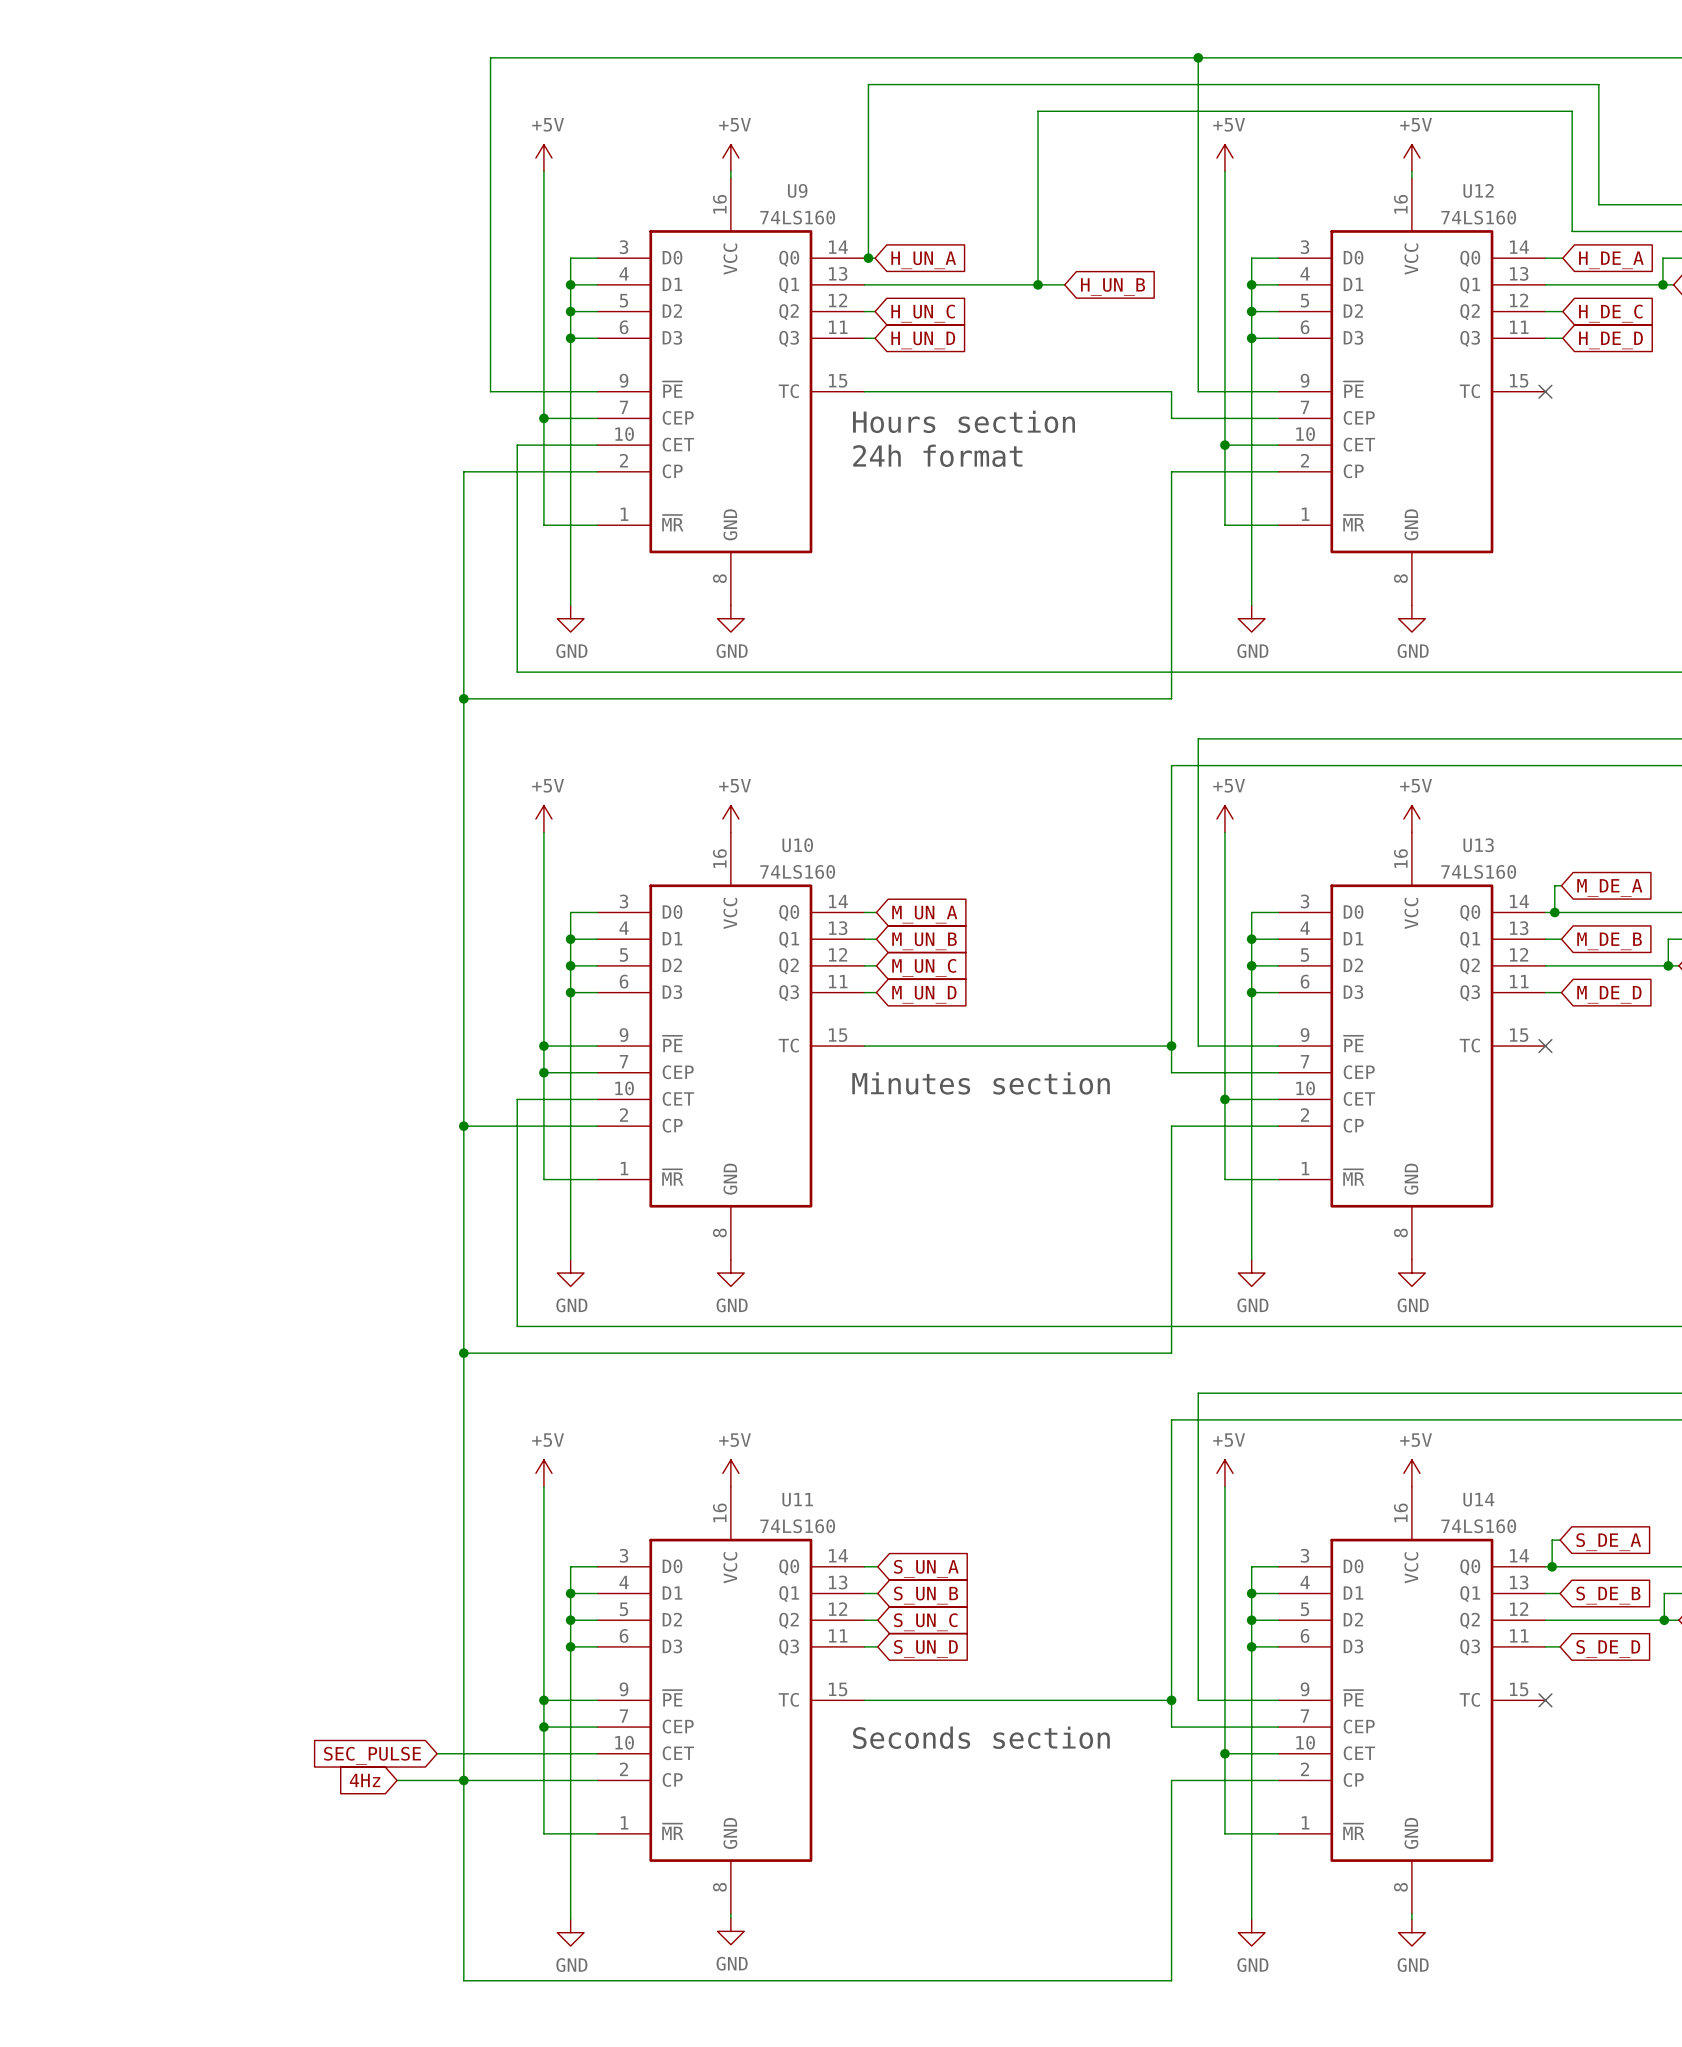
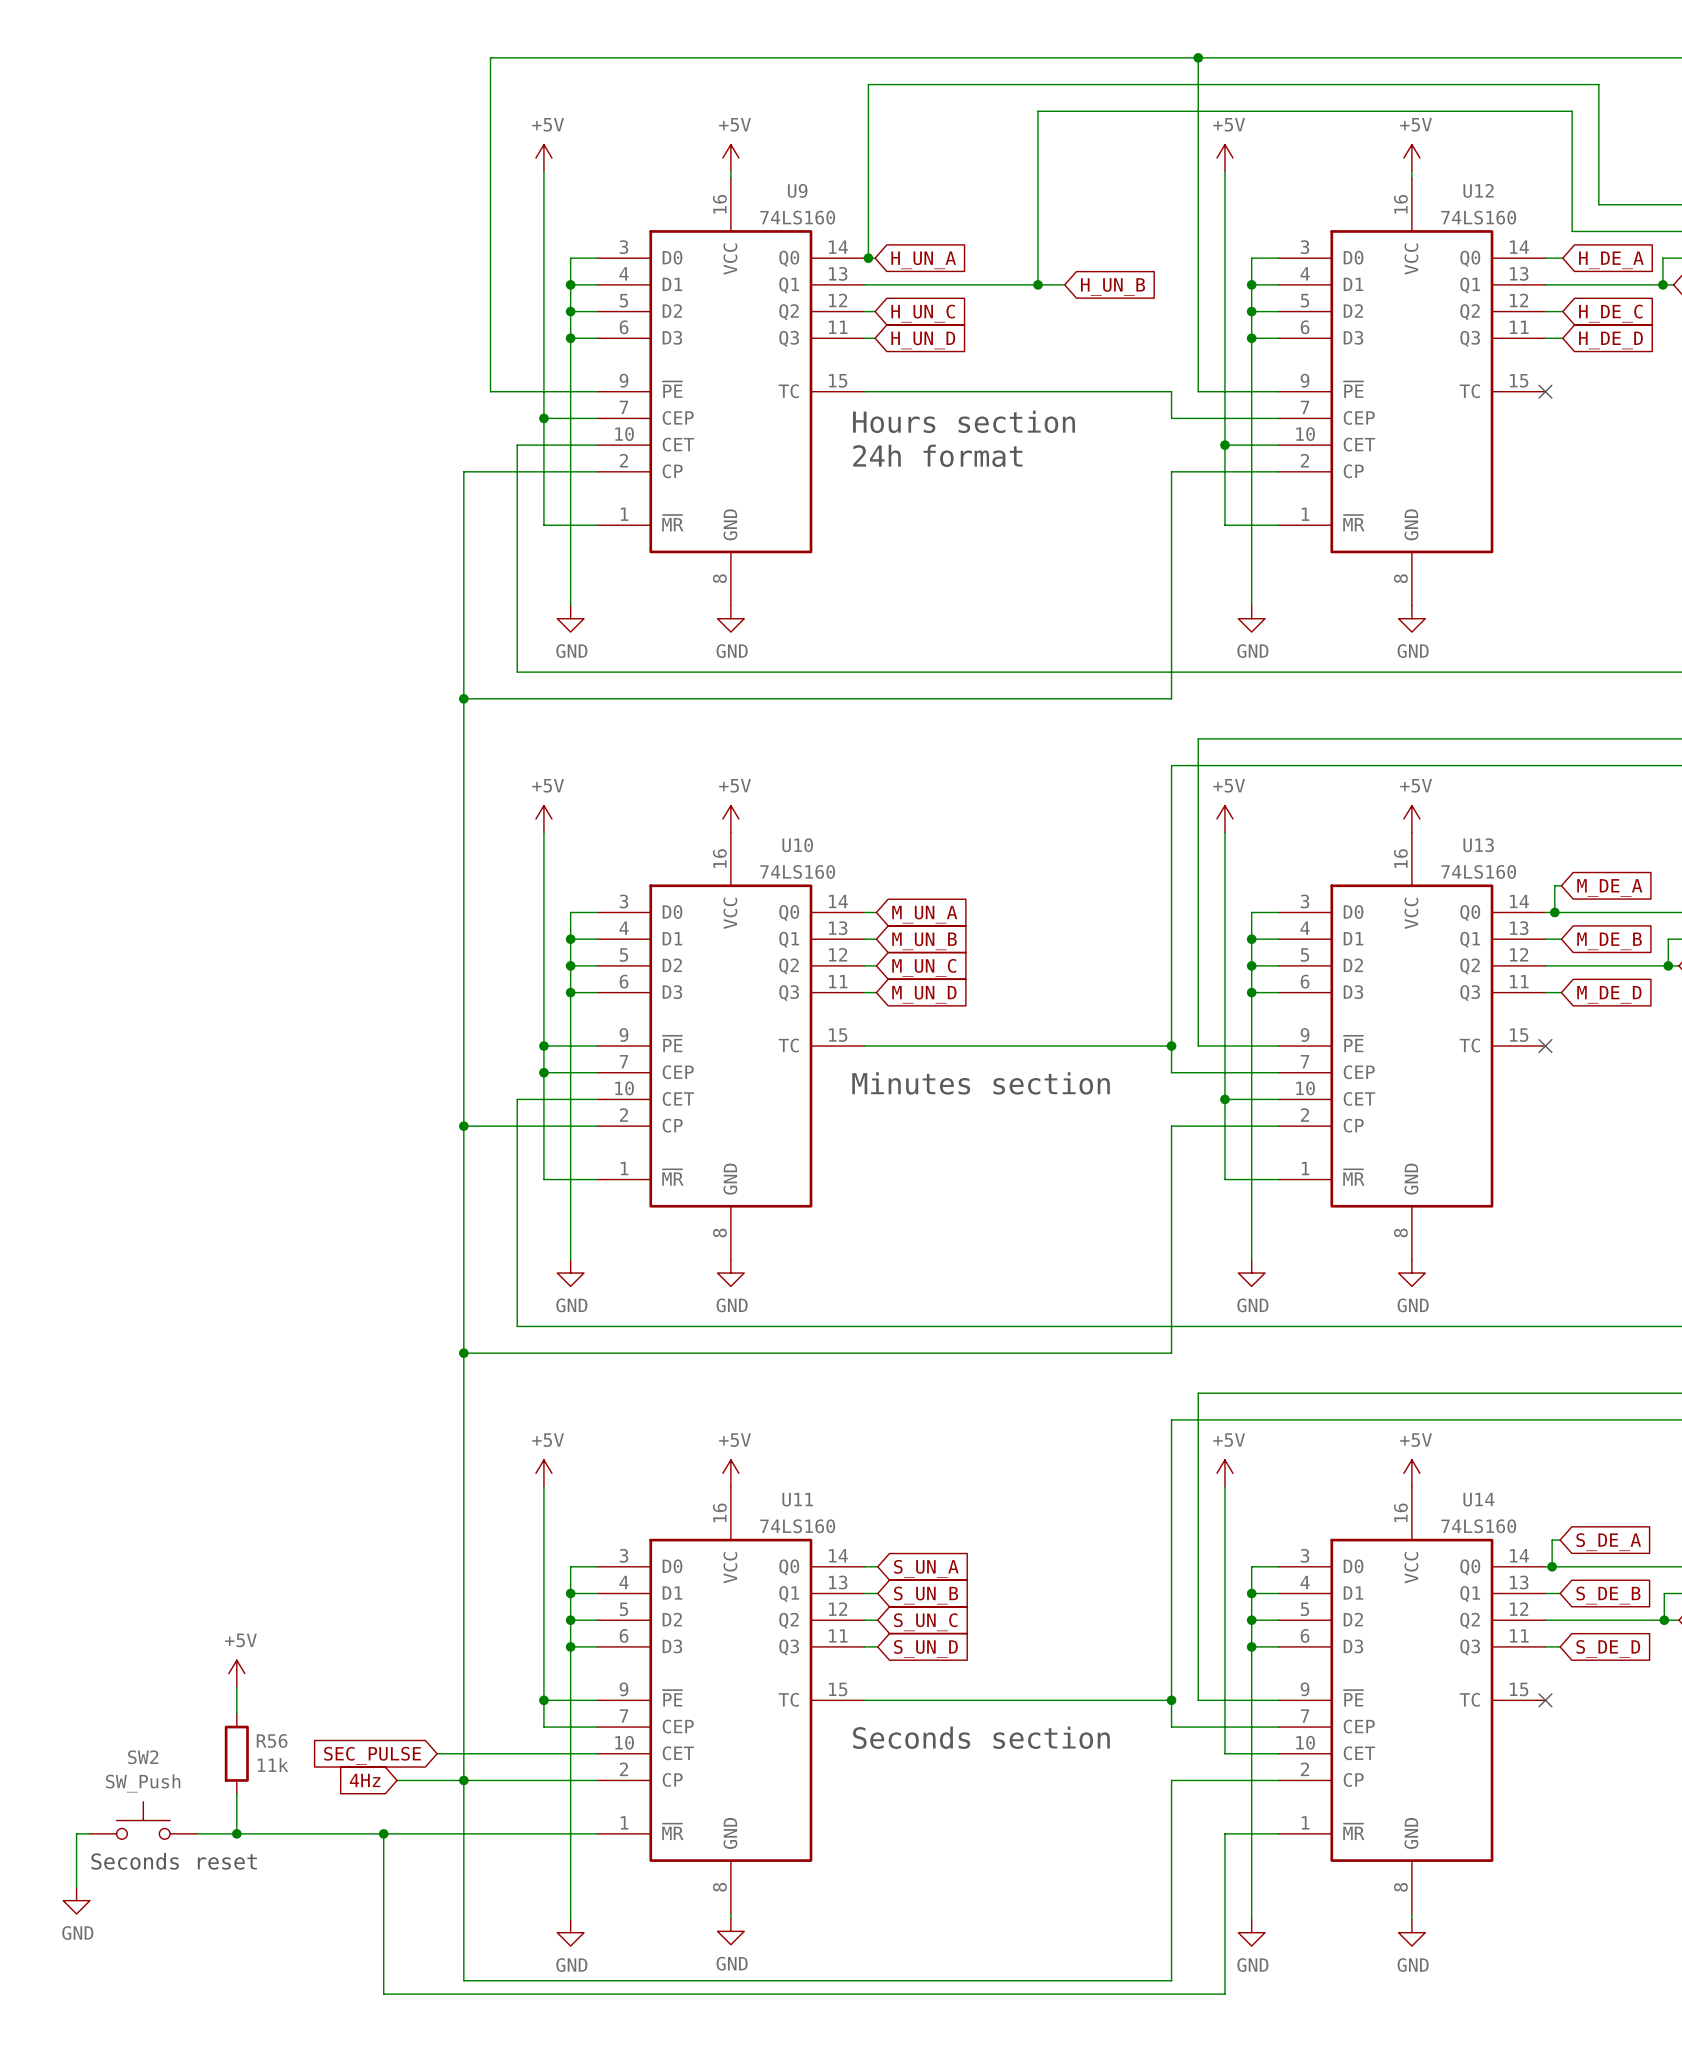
power symbol: none -> +5V (236, 1673)
wire: none -> (236, 1686) (236, 1713)
wire: (543, 1727) (543, 1833) -> (196, 1833) (543, 1833)
junction: (543, 1727) -> none
R56: none -> 11k (236, 1753)
wire: (1224, 1753) (1224, 1833) -> (383, 1833) (383, 1994) (1224, 1994) (1224, 1833)
junction: (1224, 1753) -> none
wire: none -> (236, 1793) (236, 1833)
SW2: none -> SW_Push (143, 1820)
wire: none -> (89, 1833) (76, 1833) (76, 1887)
junction: none -> (236, 1833)
junction: none -> (383, 1833)
text: none -> Seconds reset (174, 1861)
power symbol: none -> GND (76, 1900)

